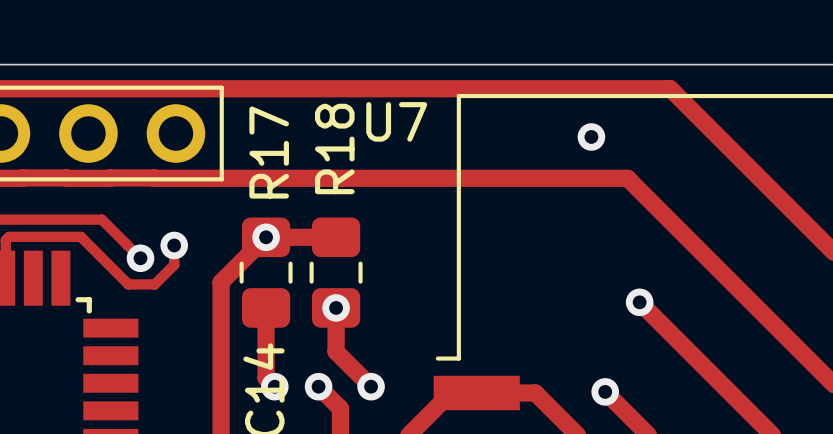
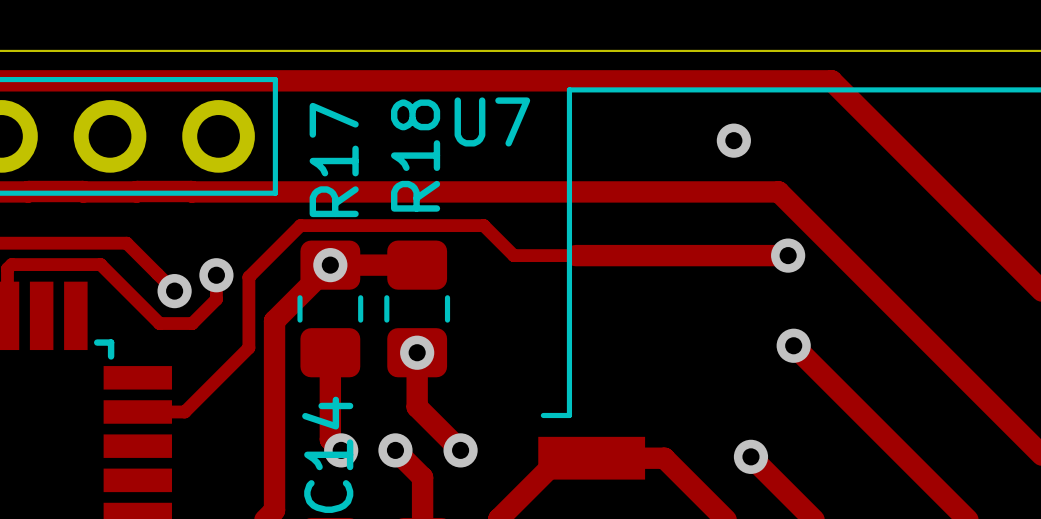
track: none -> (788, 255) (513, 255) (483, 225) (300, 225) (248, 277) (248, 347) (184, 411) (137, 411)
via: none -> (788, 255)

